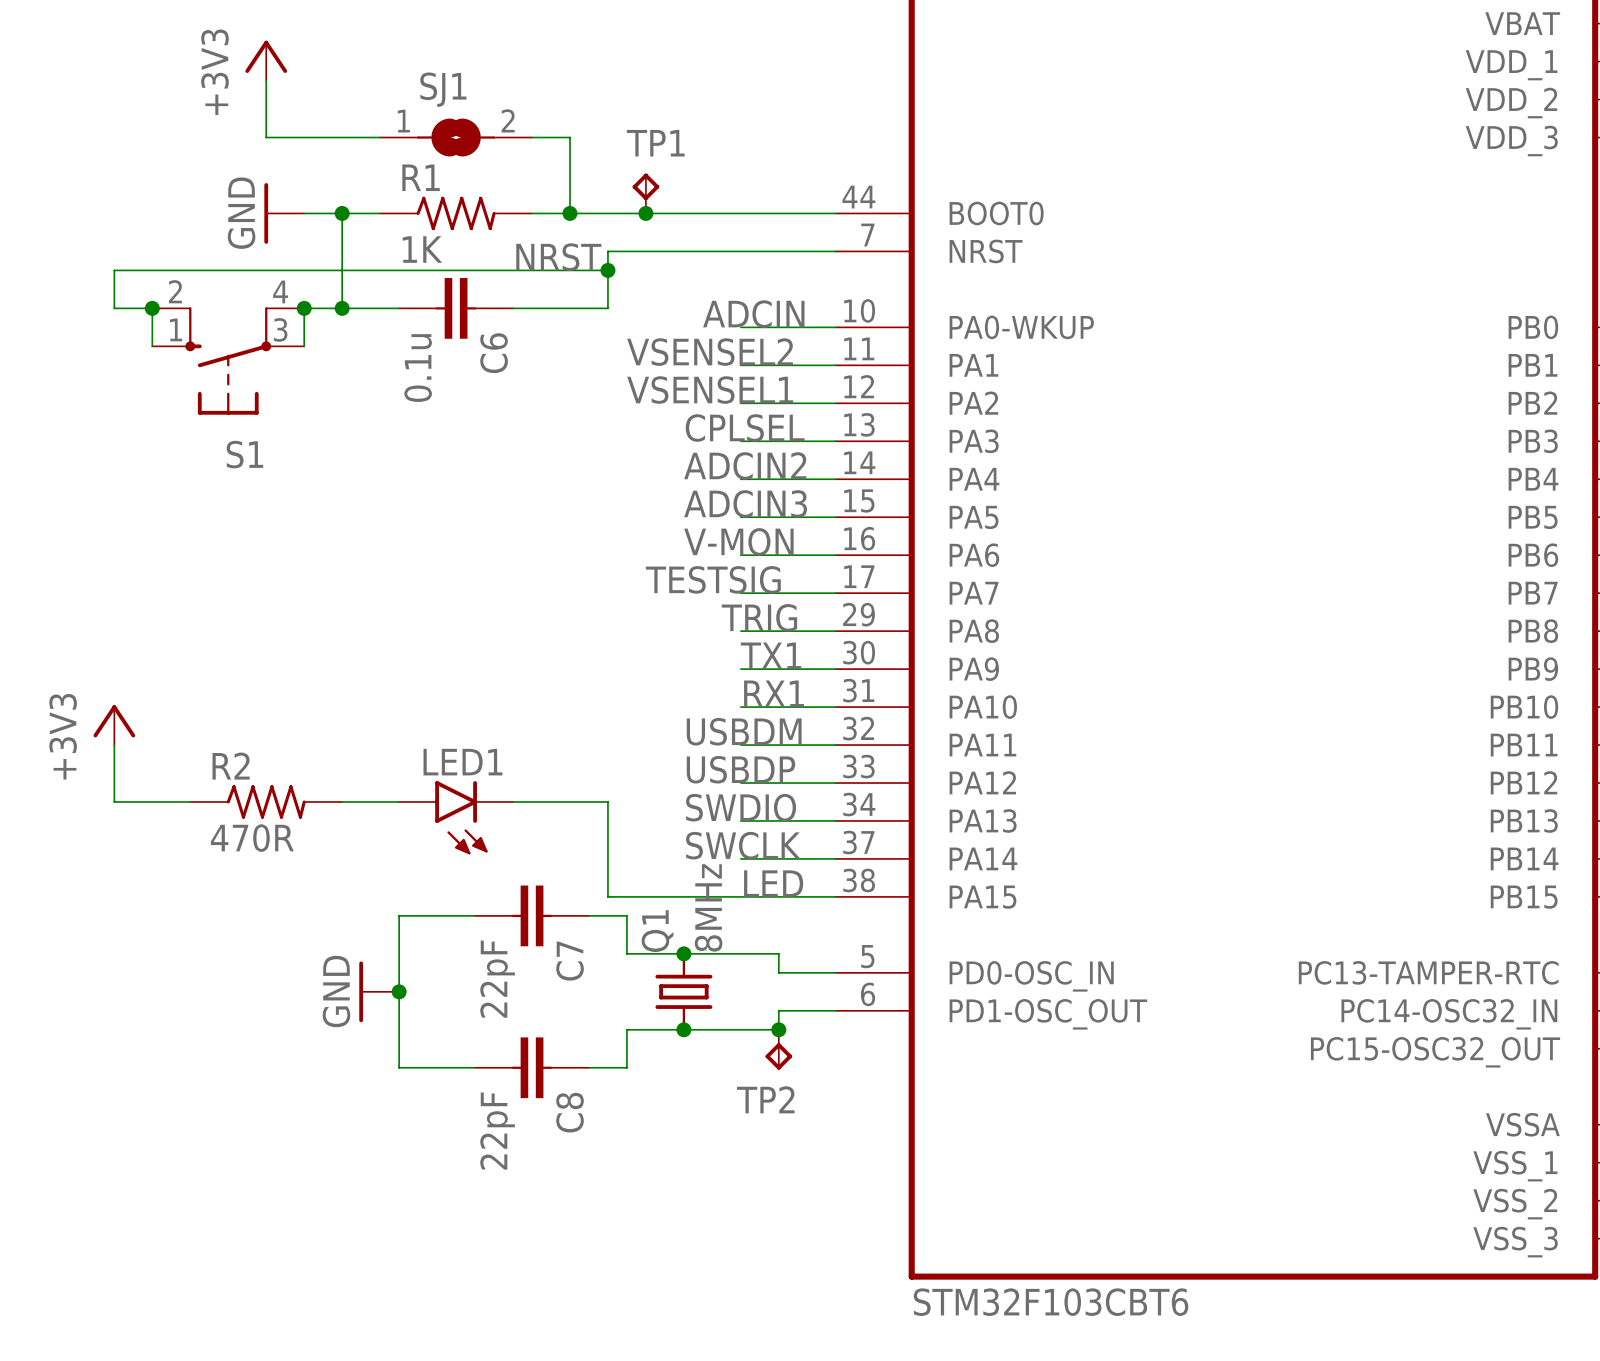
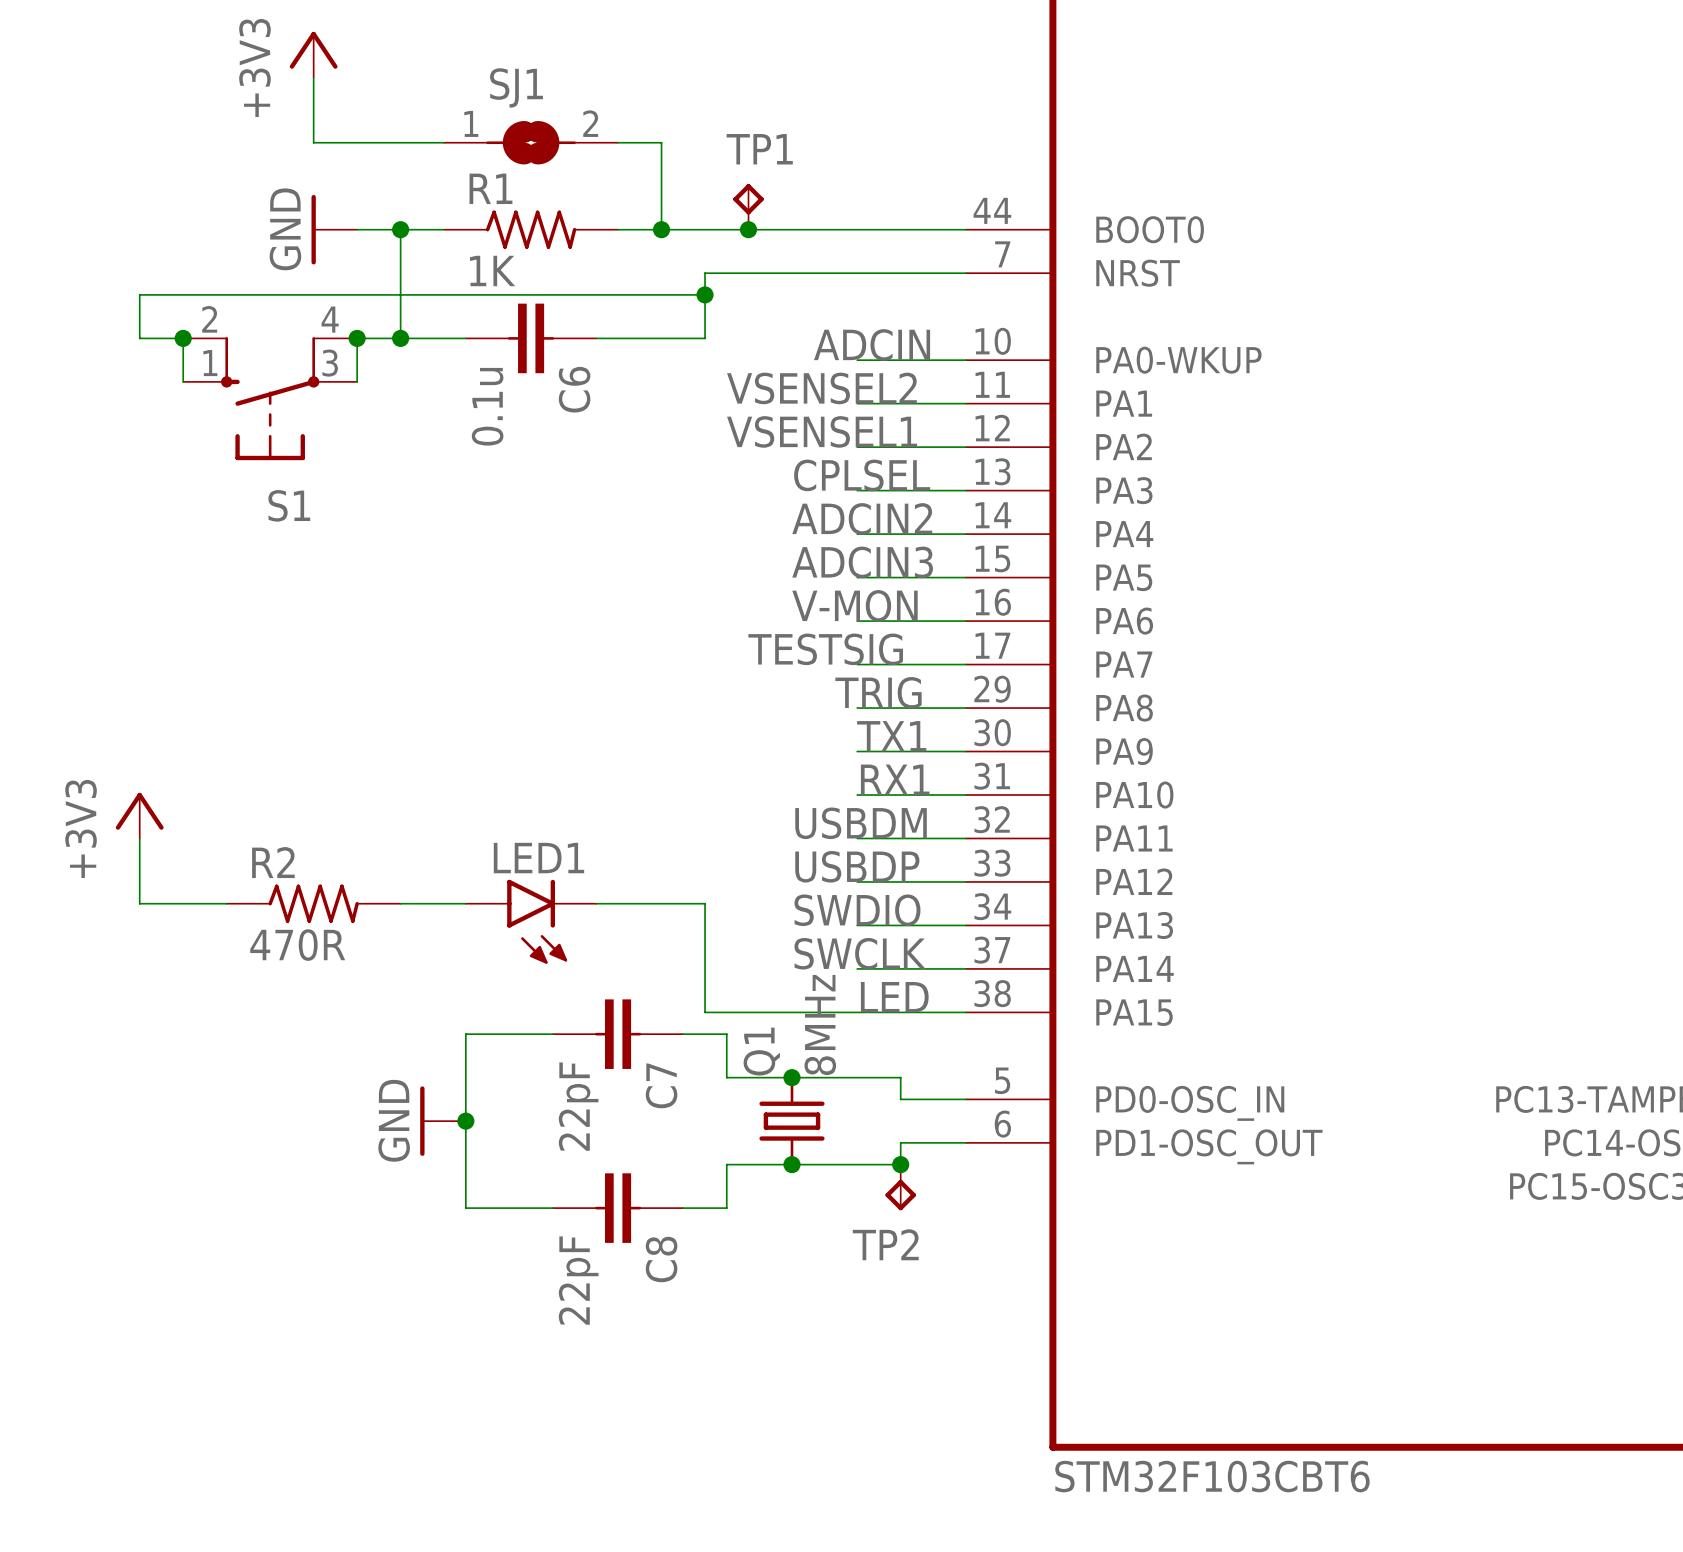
label: NRST (558, 257) -> none

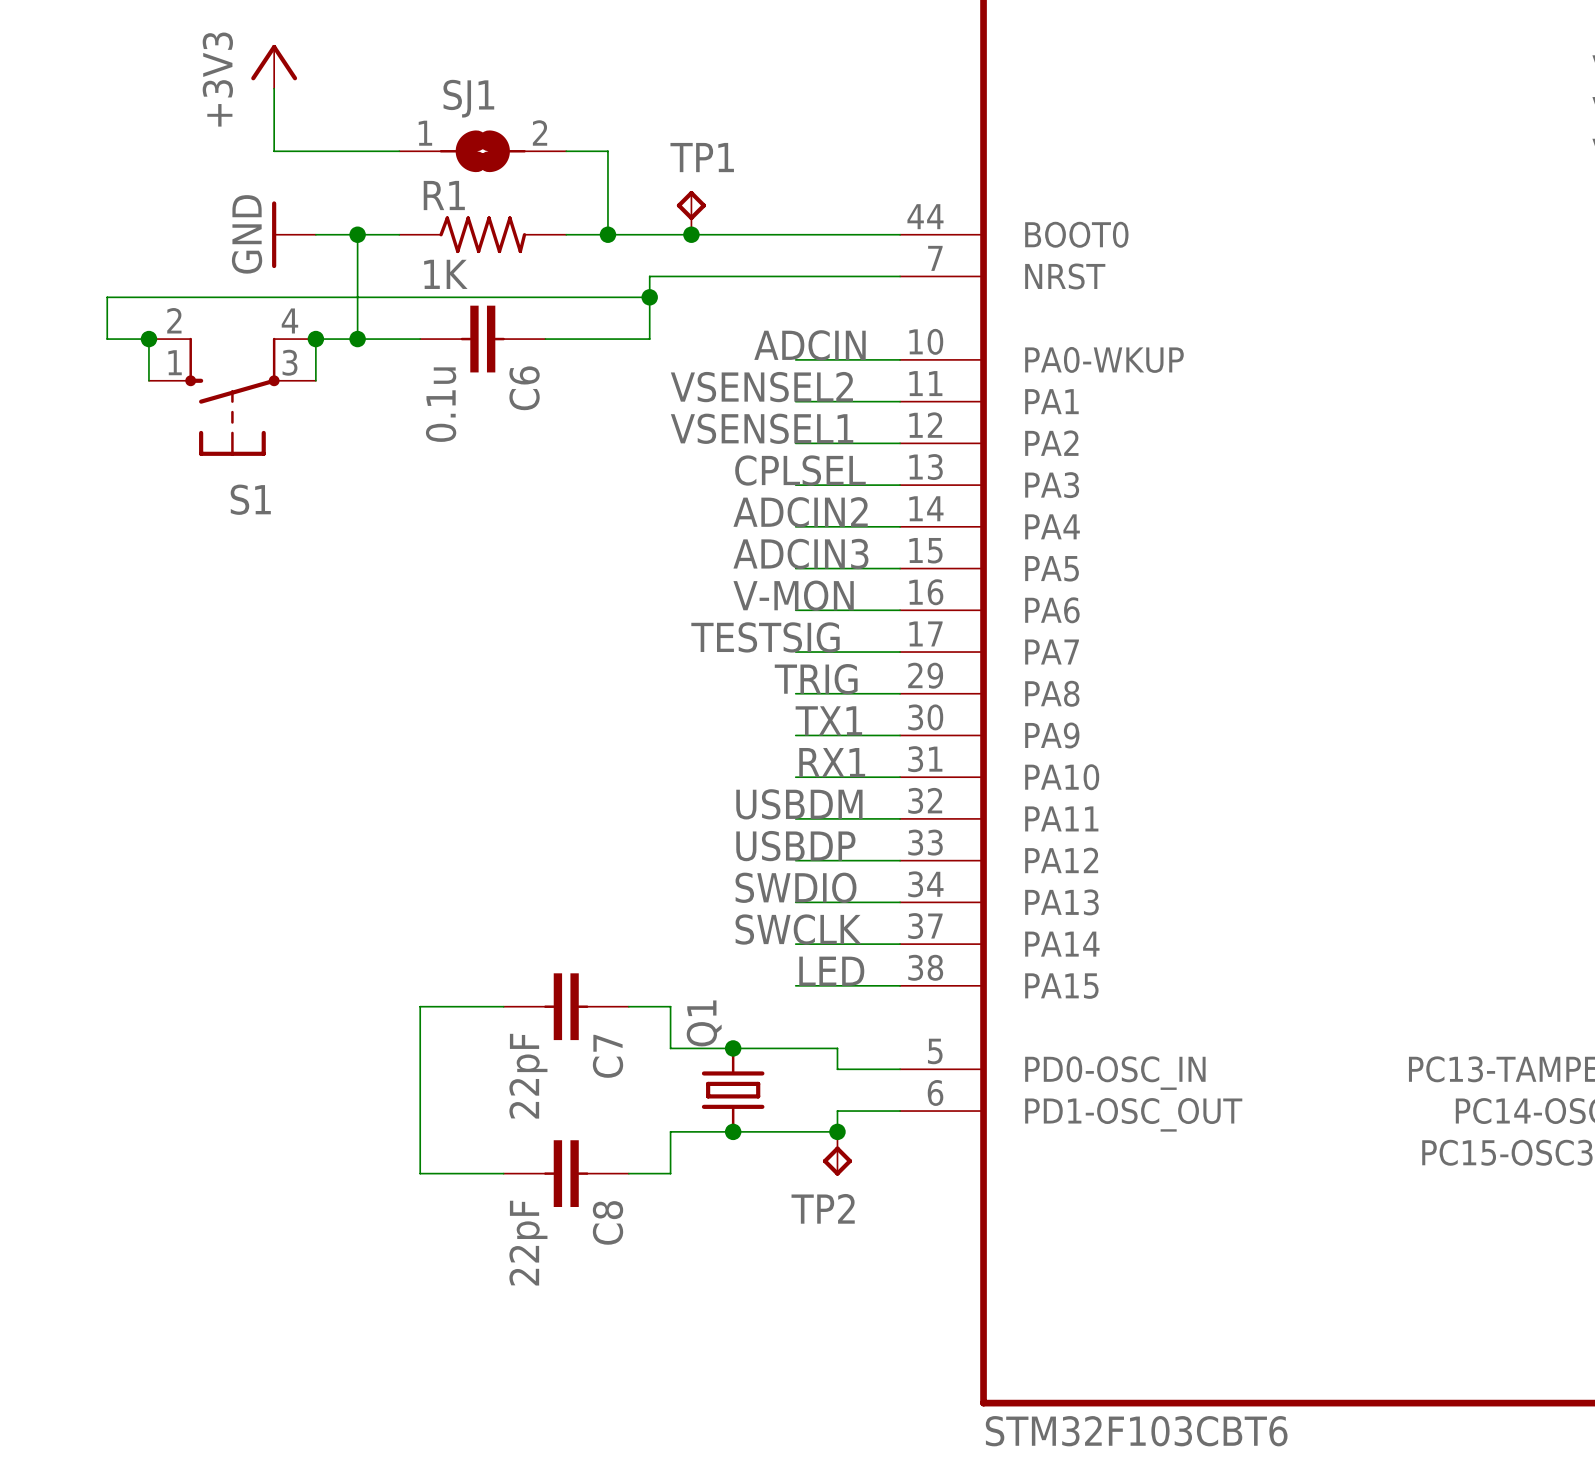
power symbol: +3V3 (139, 815) -> none
wire: (139, 838) (139, 903) (226, 903) -> none
R2: 470R (313, 903) -> none
wire: (400, 903) (465, 903) -> none
wire: (596, 903) (705, 903) (705, 1012) (857, 1012) -> none
LED1: (531, 921) -> none
Q1 value: 8MHz (820, 1025) -> none
power symbol: GND (443, 1121) -> none
junction: (465, 1121) -> none

